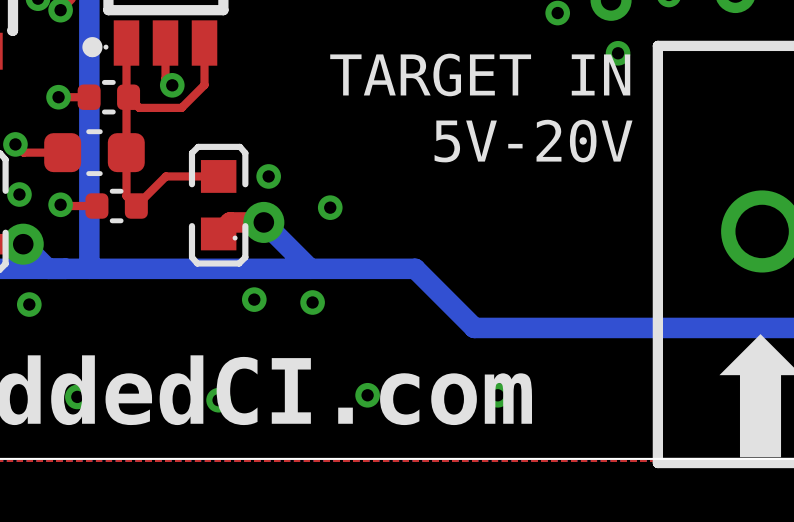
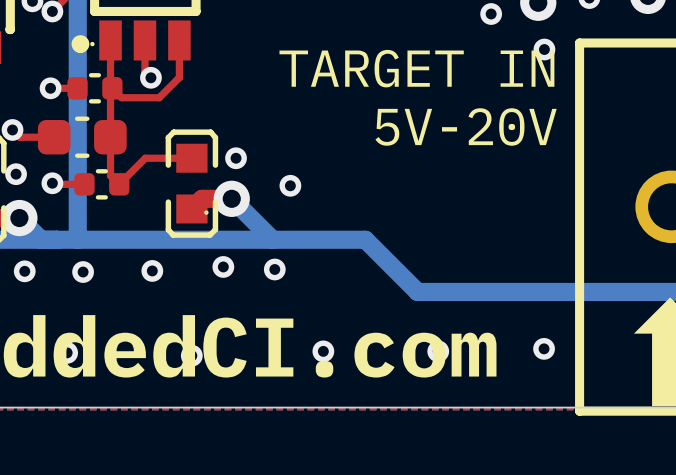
via: none -> (152, 270)
via: none -> (83, 272)
via: none -> (544, 348)

